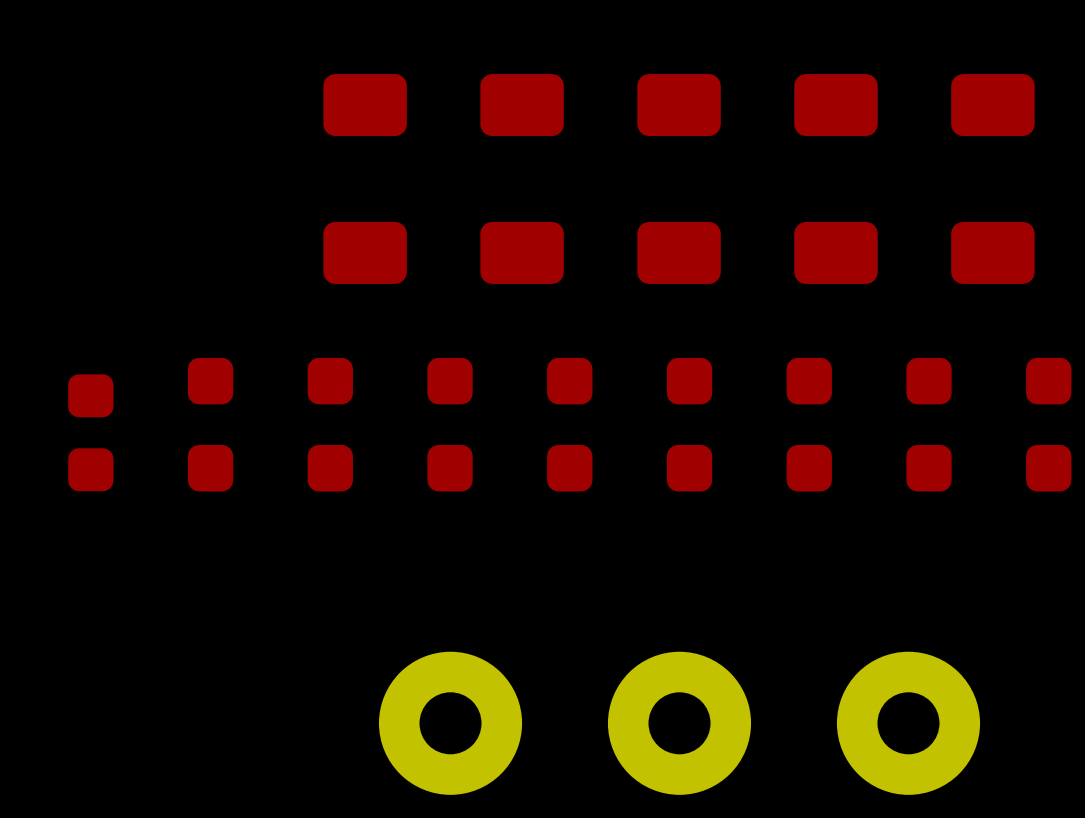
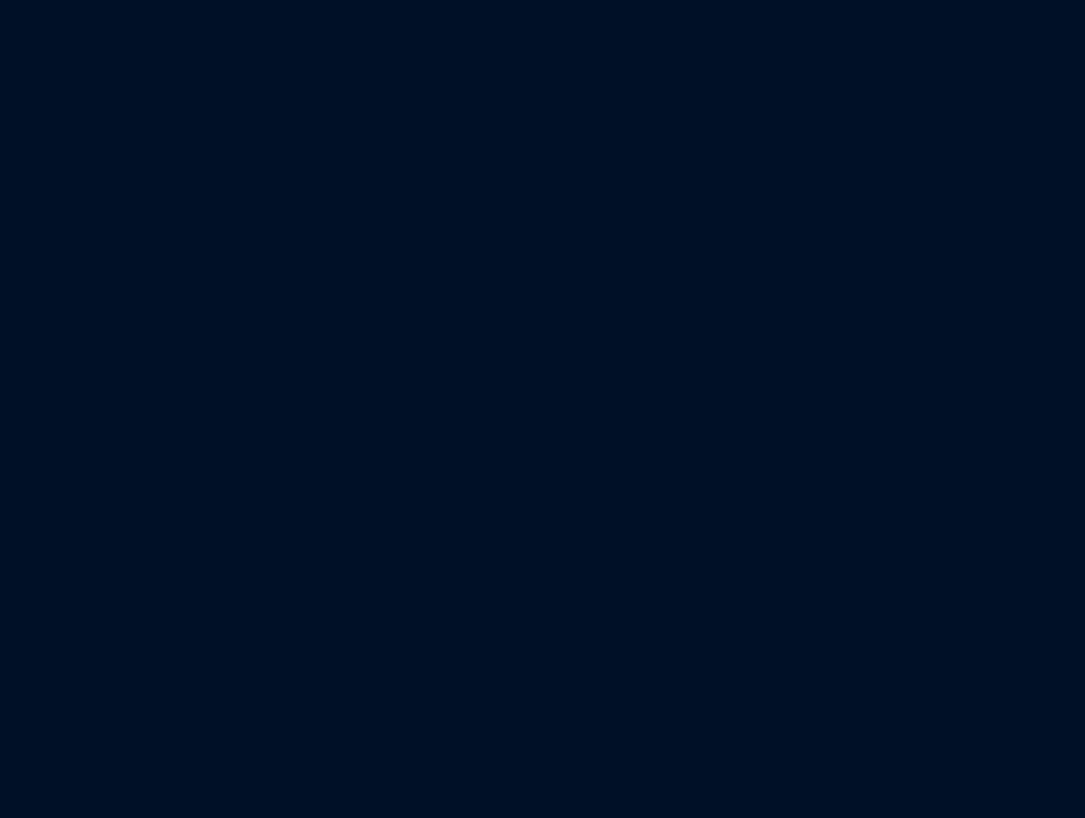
part: (365, 178) -> none
part: (522, 178) -> none
part: (679, 178) -> none
part: (835, 178) -> none
part: (992, 178) -> none
part: (210, 424) -> none
part: (330, 424) -> none
part: (450, 424) -> none
part: (569, 424) -> none
part: (689, 424) -> none
part: (809, 424) -> none
part: (929, 424) -> none
part: (1048, 424) -> none
part: (90, 432) -> none
part: (679, 723) -> none

